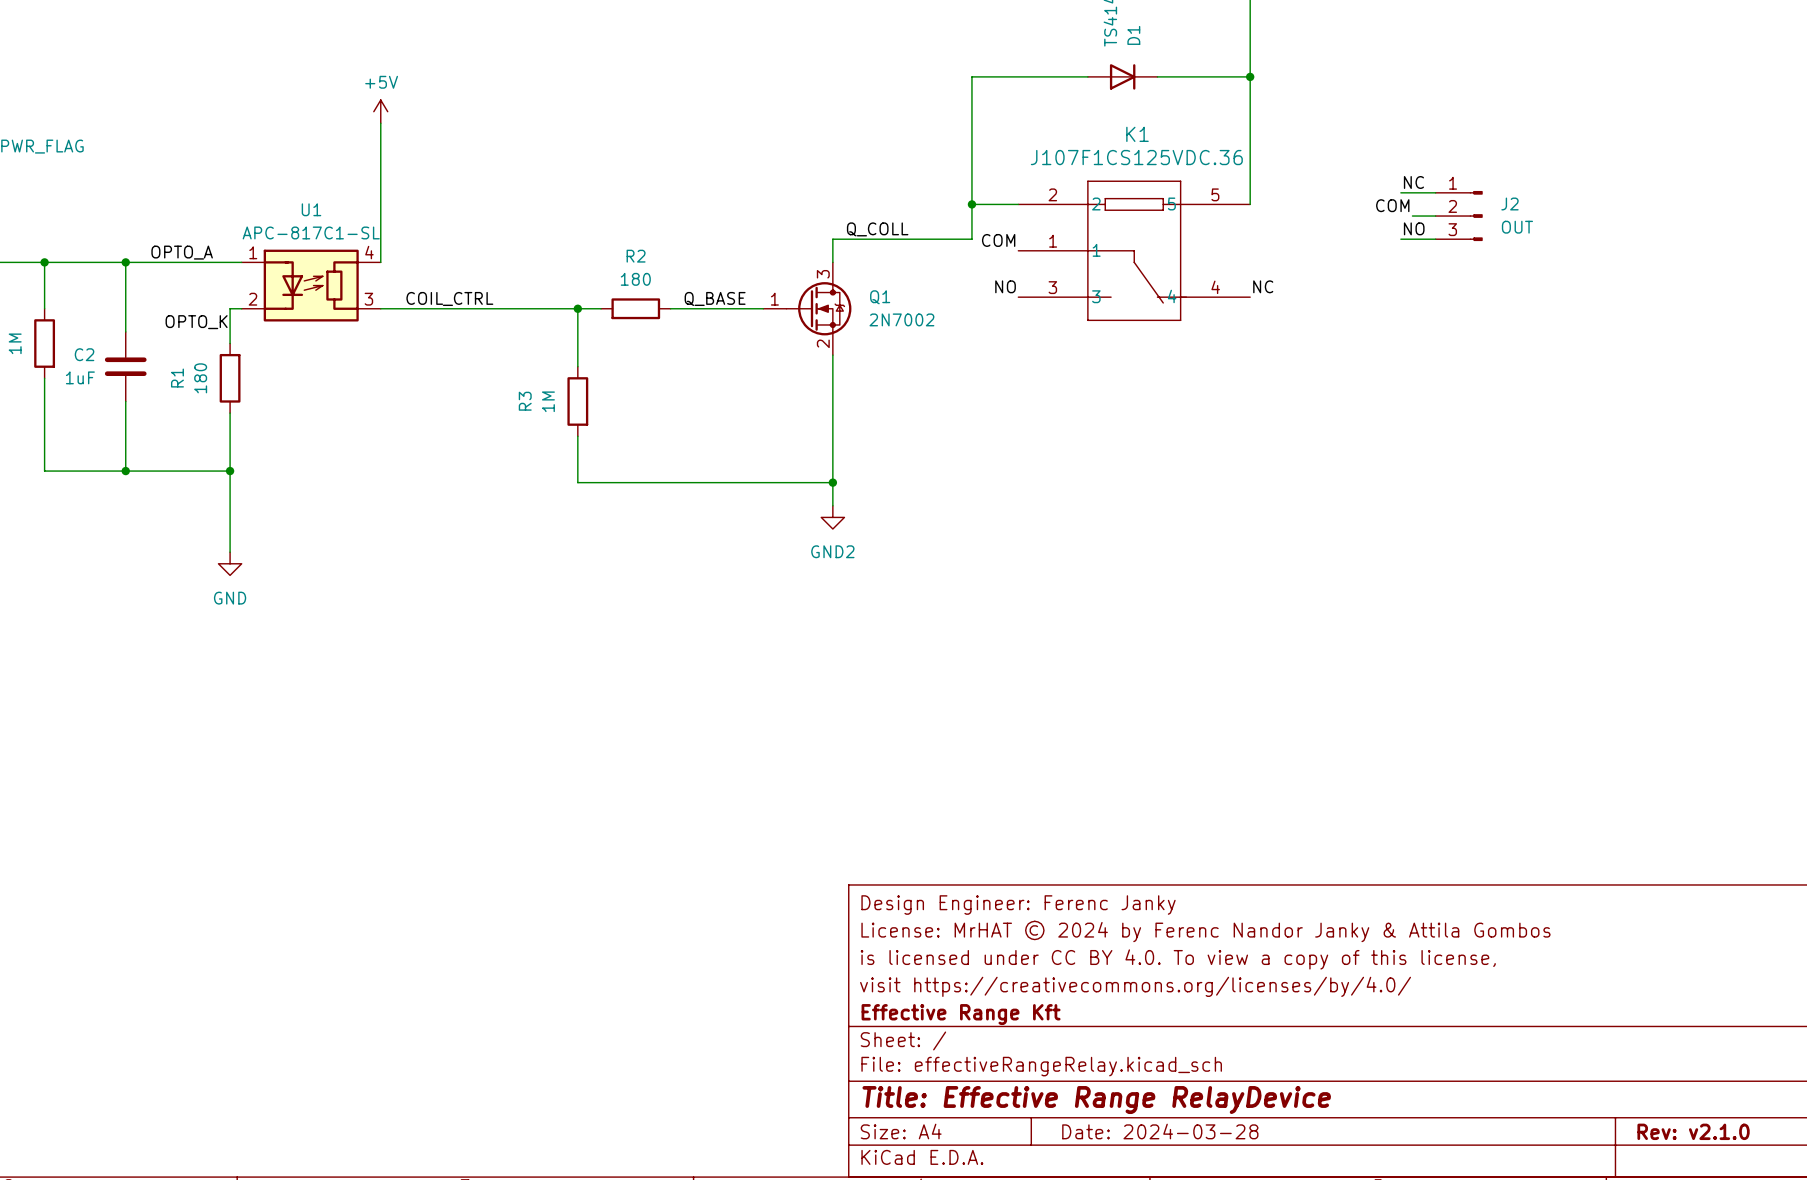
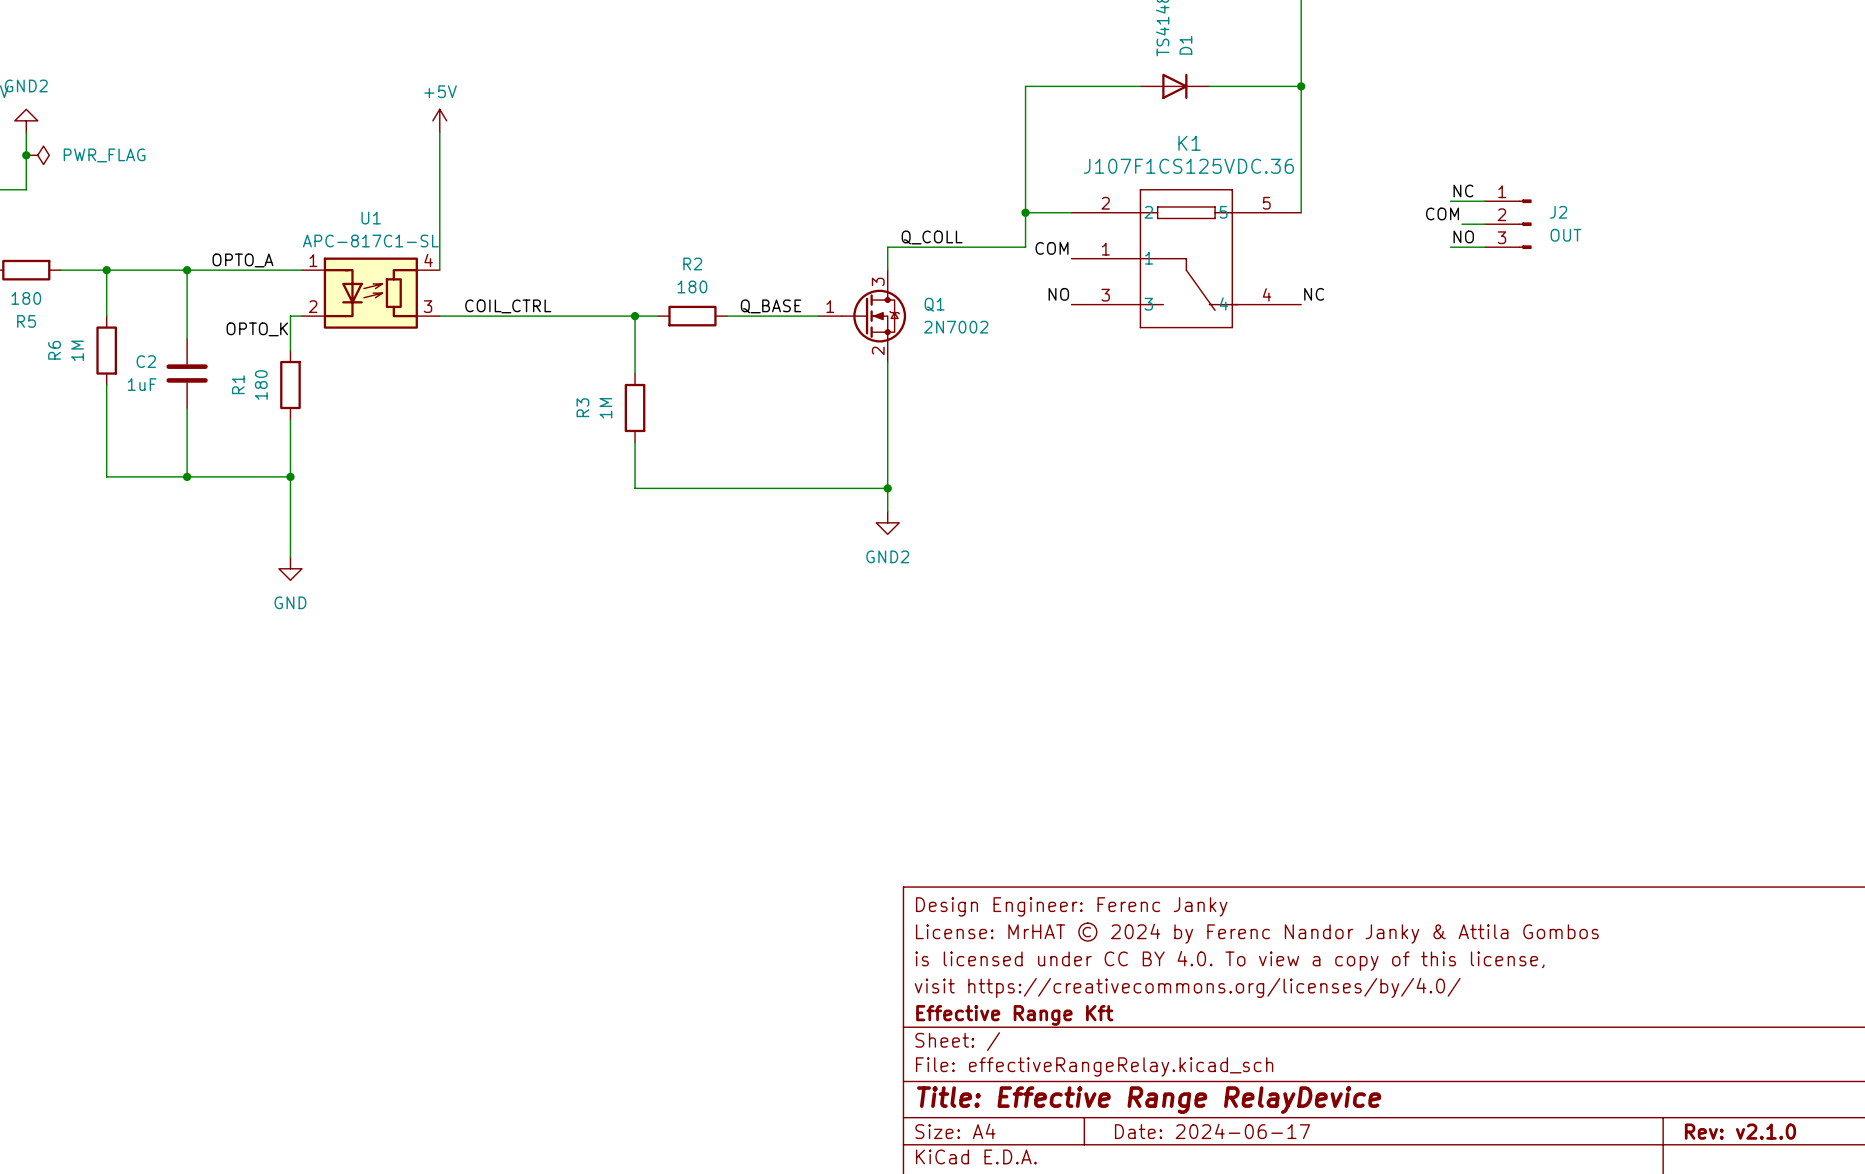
title block: Date: 2024-03-28 (1160, 1131) -> Date: 2024-06-17 (1212, 1131)

